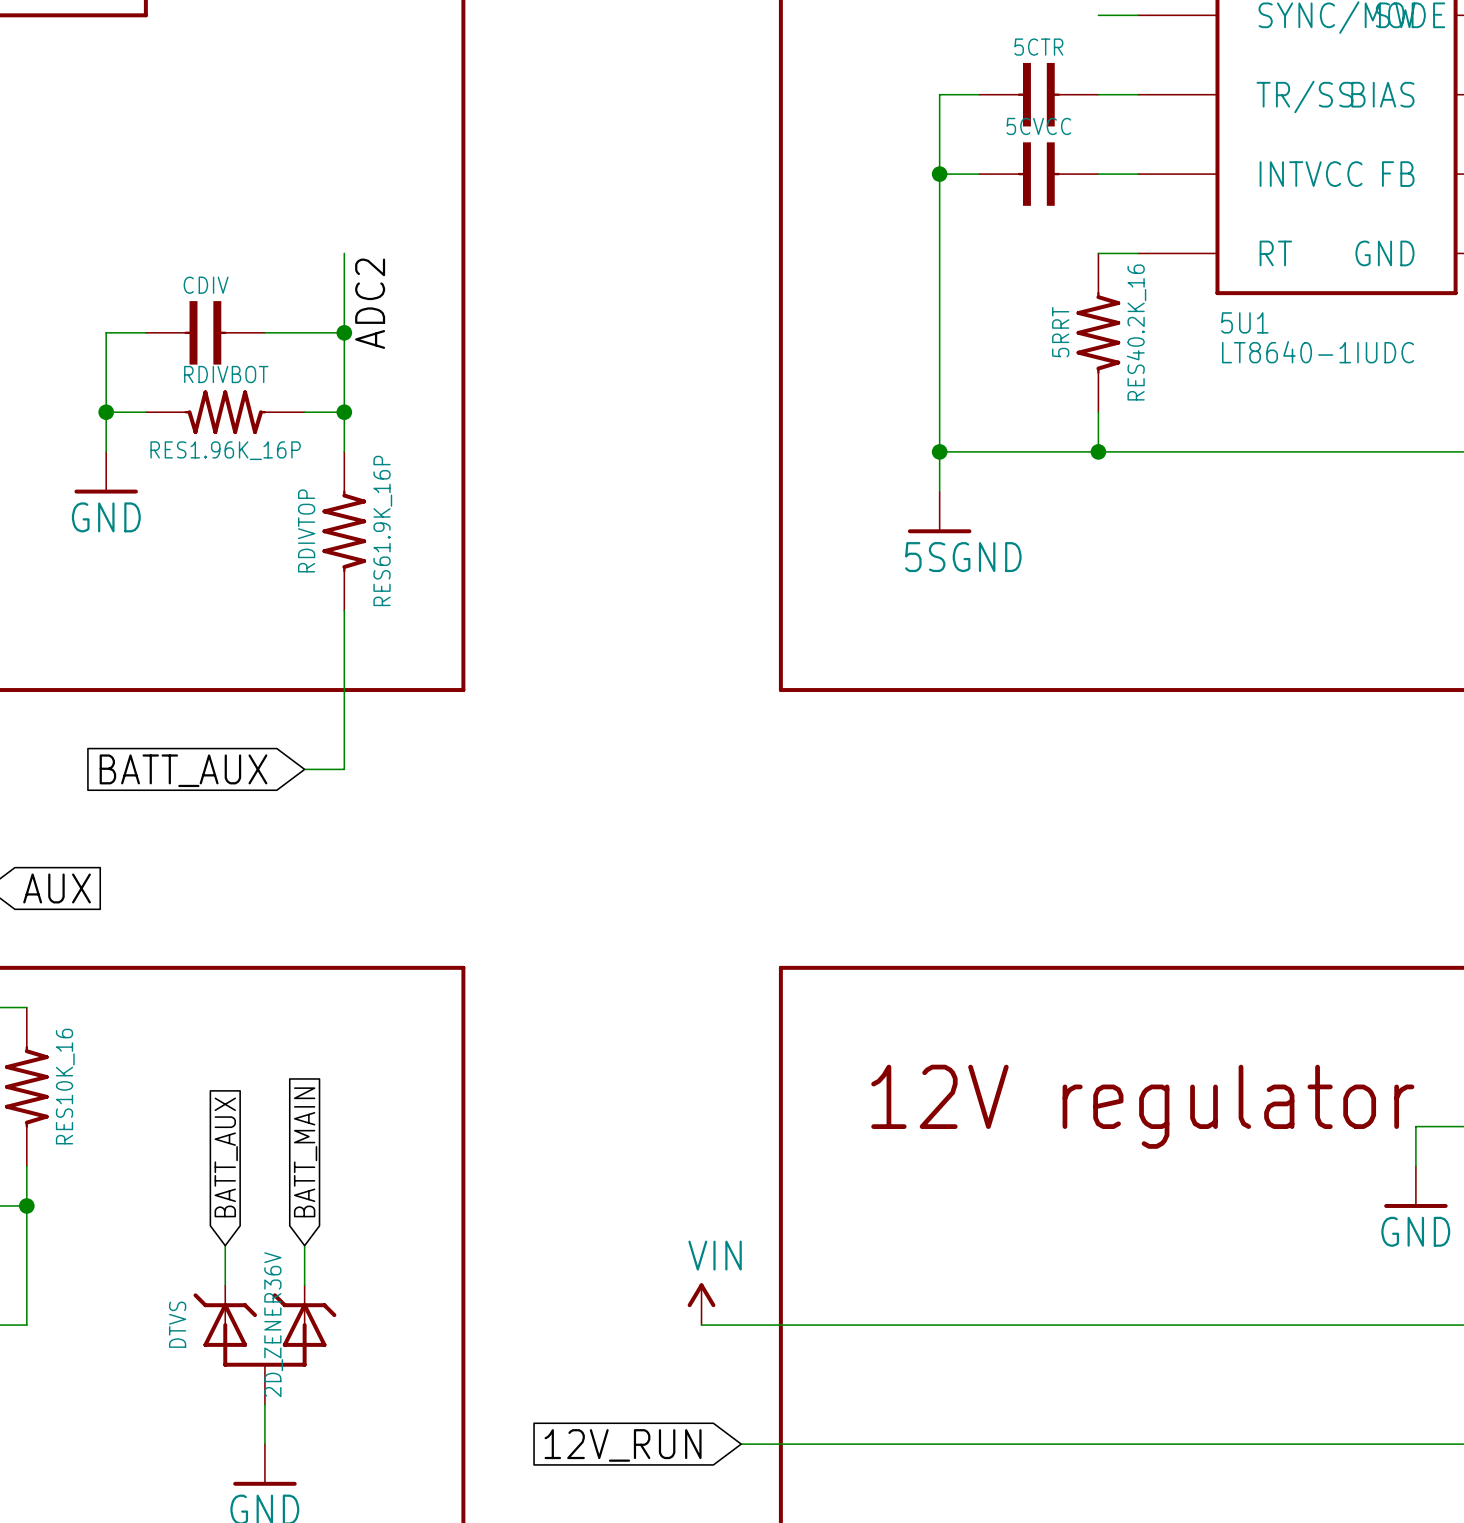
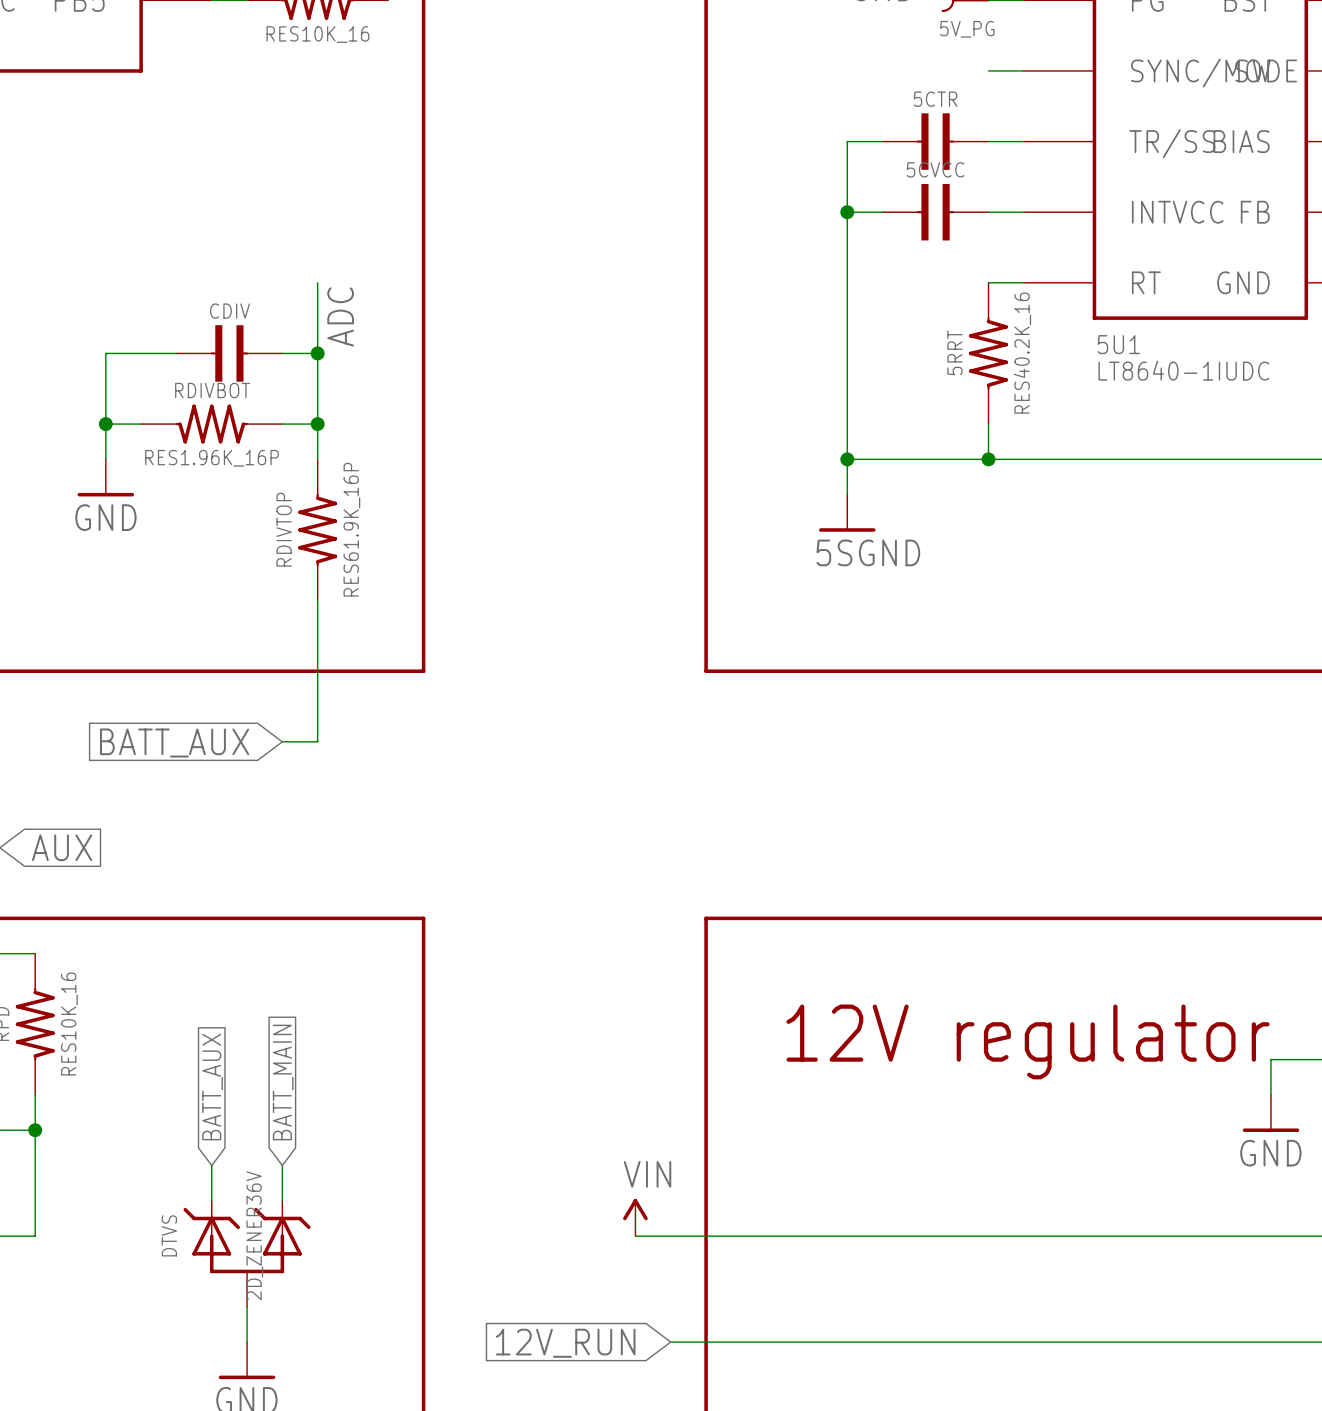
label: ADC2 (370, 303) -> ADC (340, 316)
CDIV position: (205, 332) -> (229, 353)

